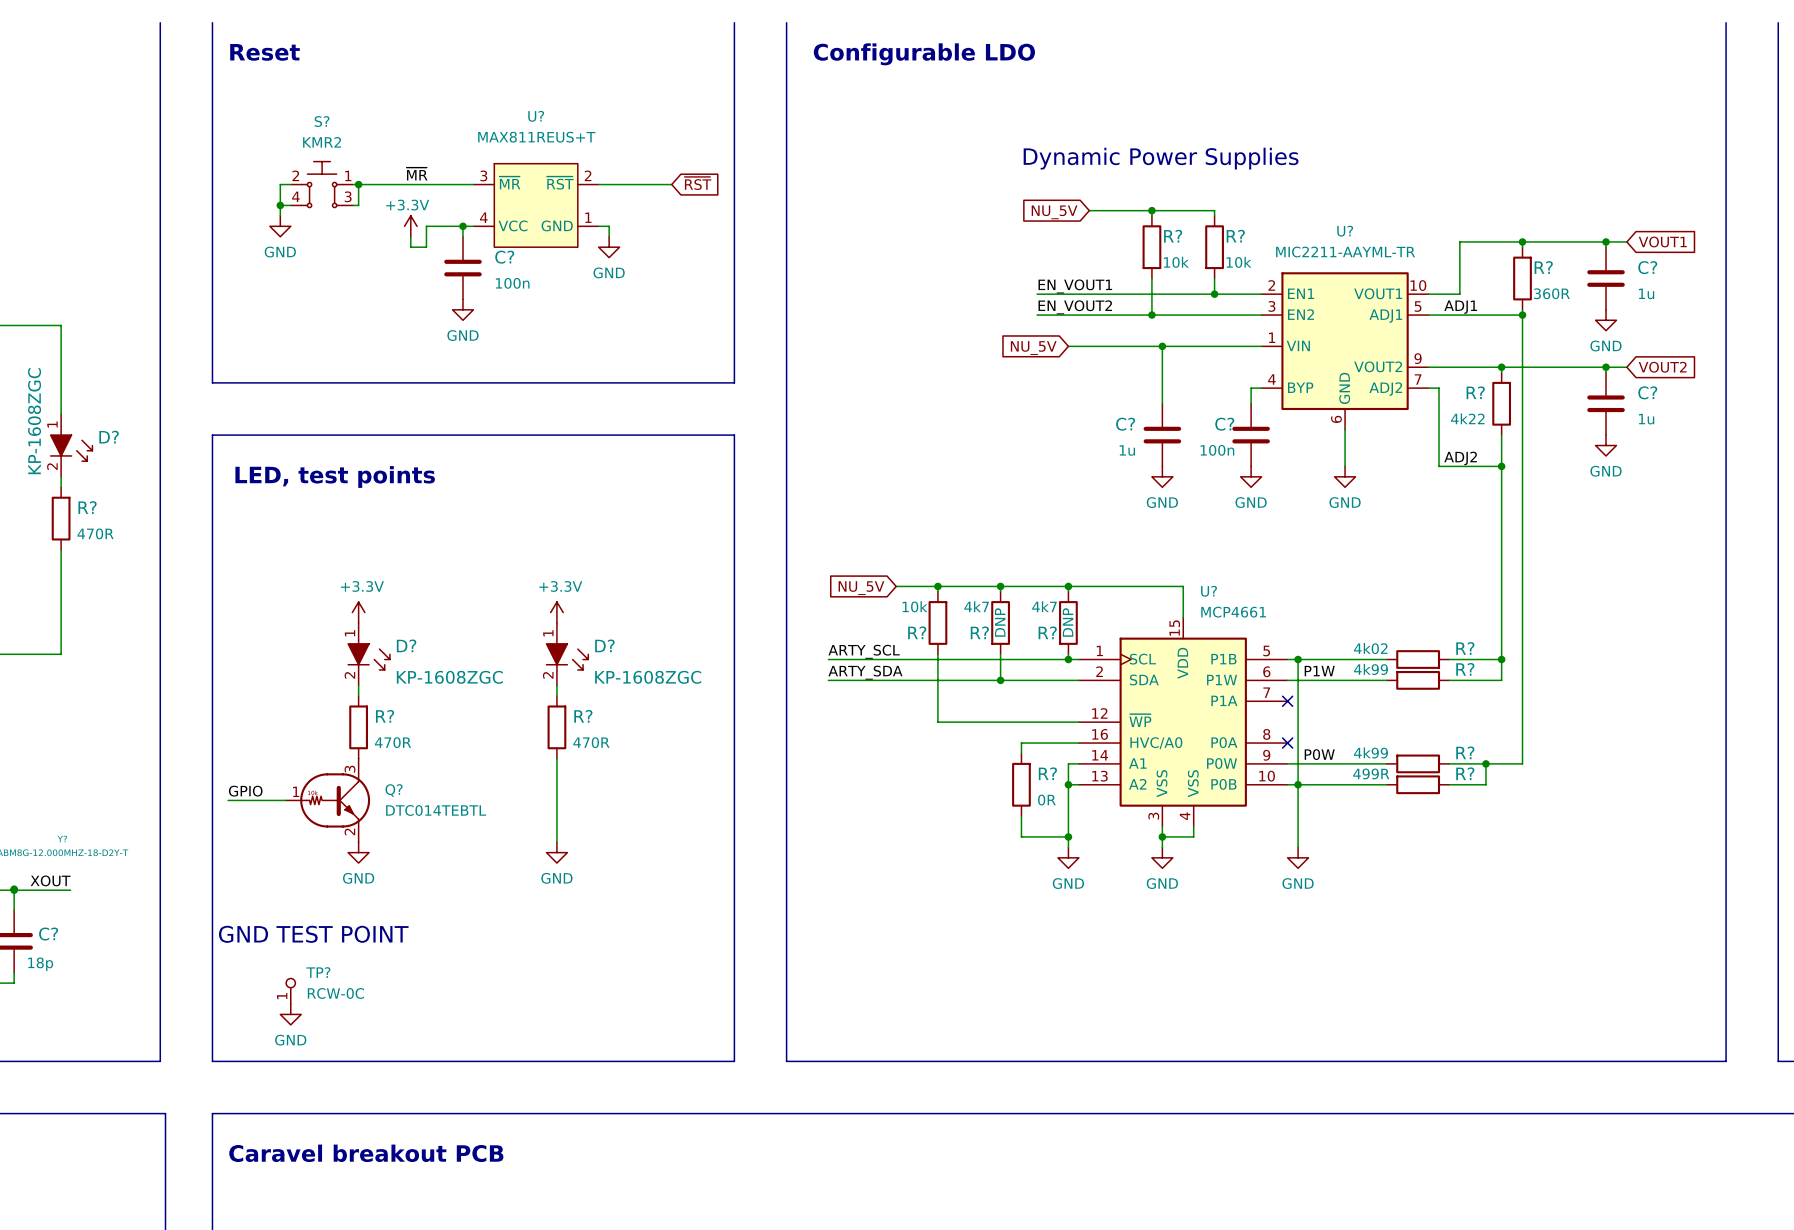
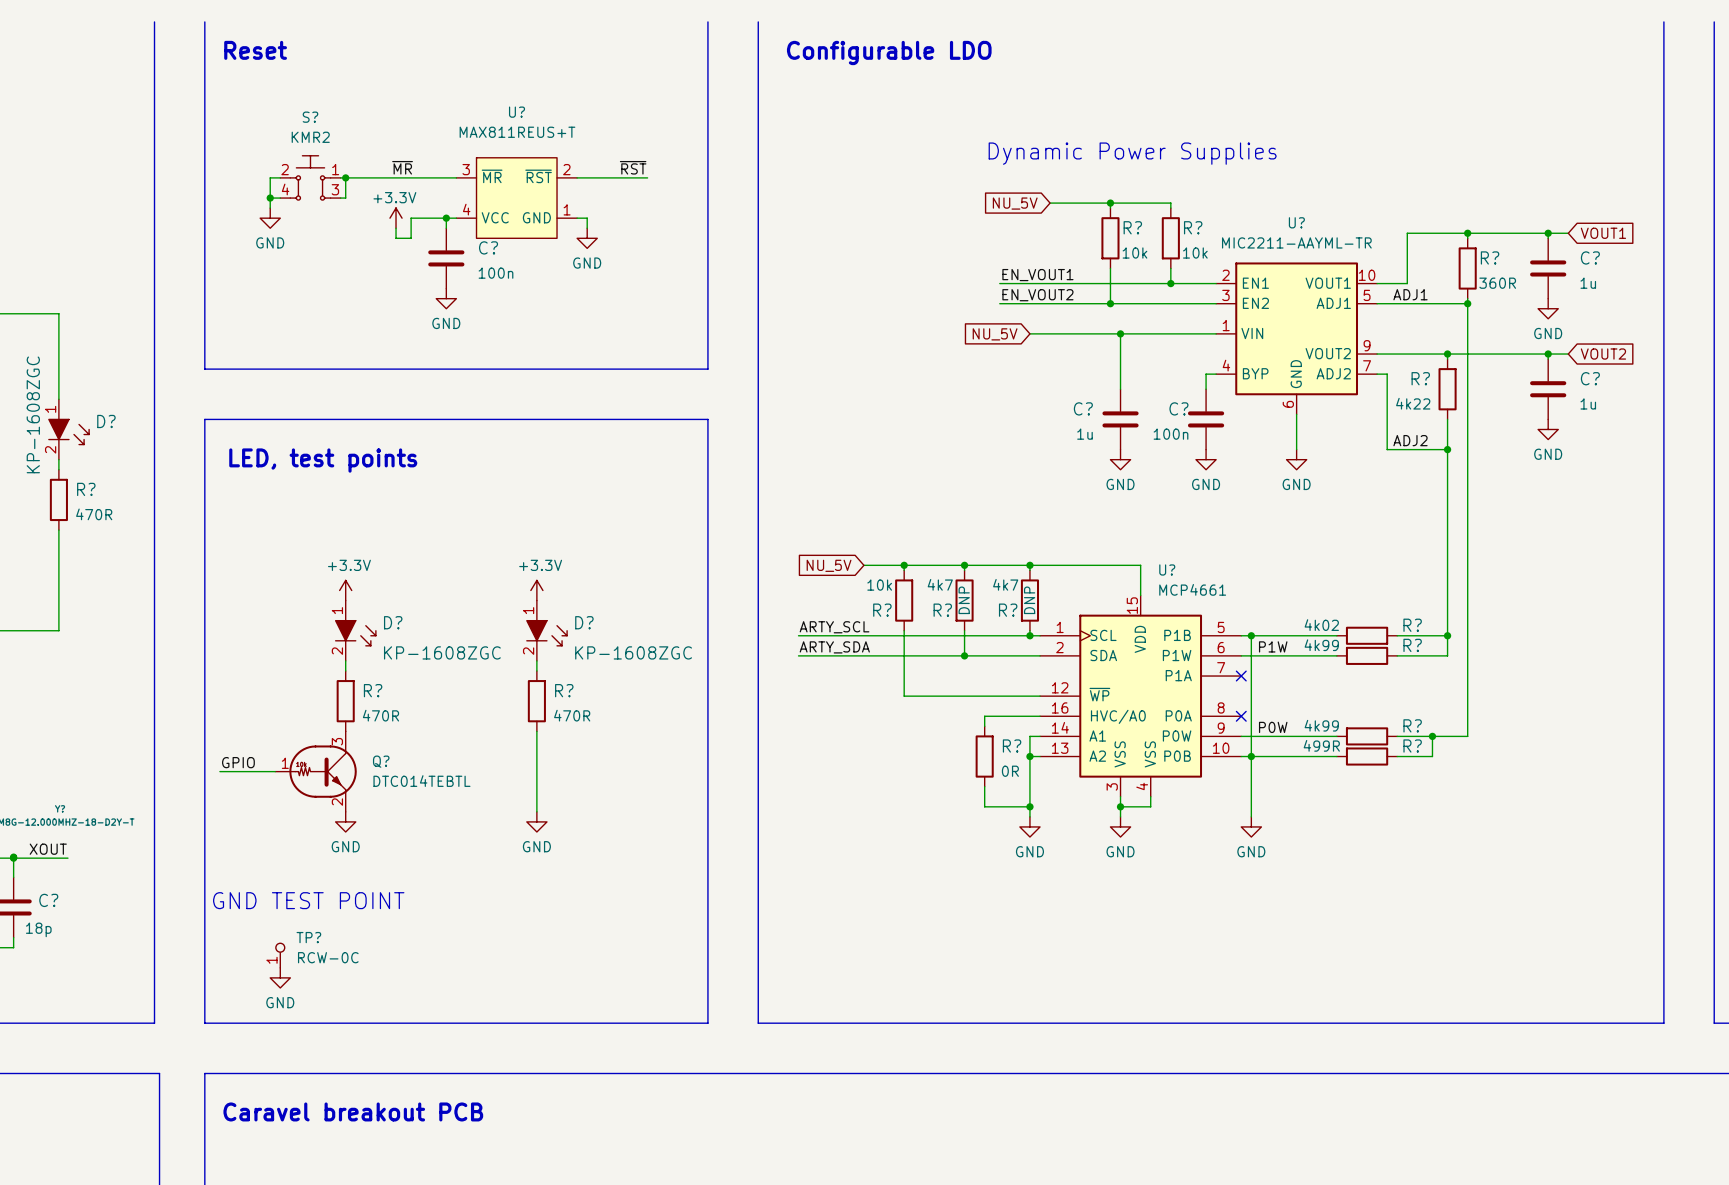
label: none -> ~{RST} (633, 167)
global label: ~{RST} (697, 183) -> none

